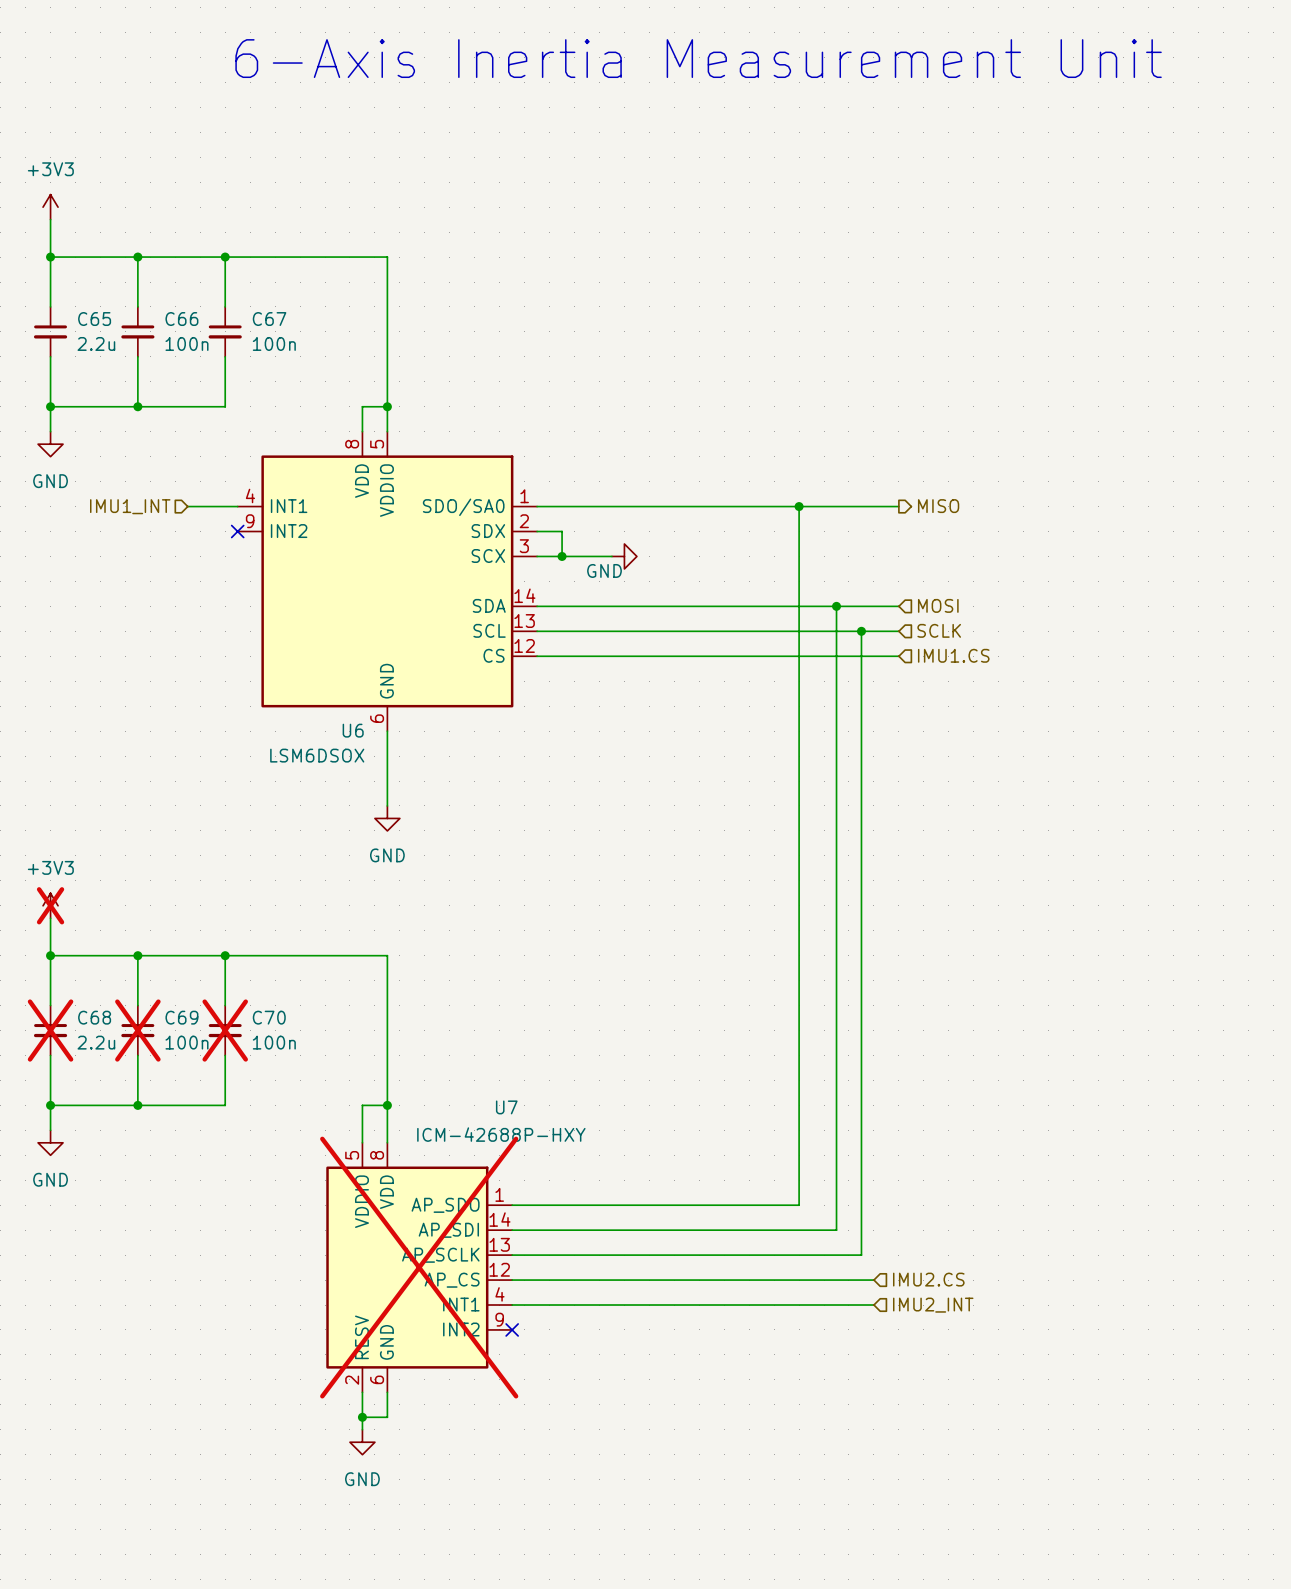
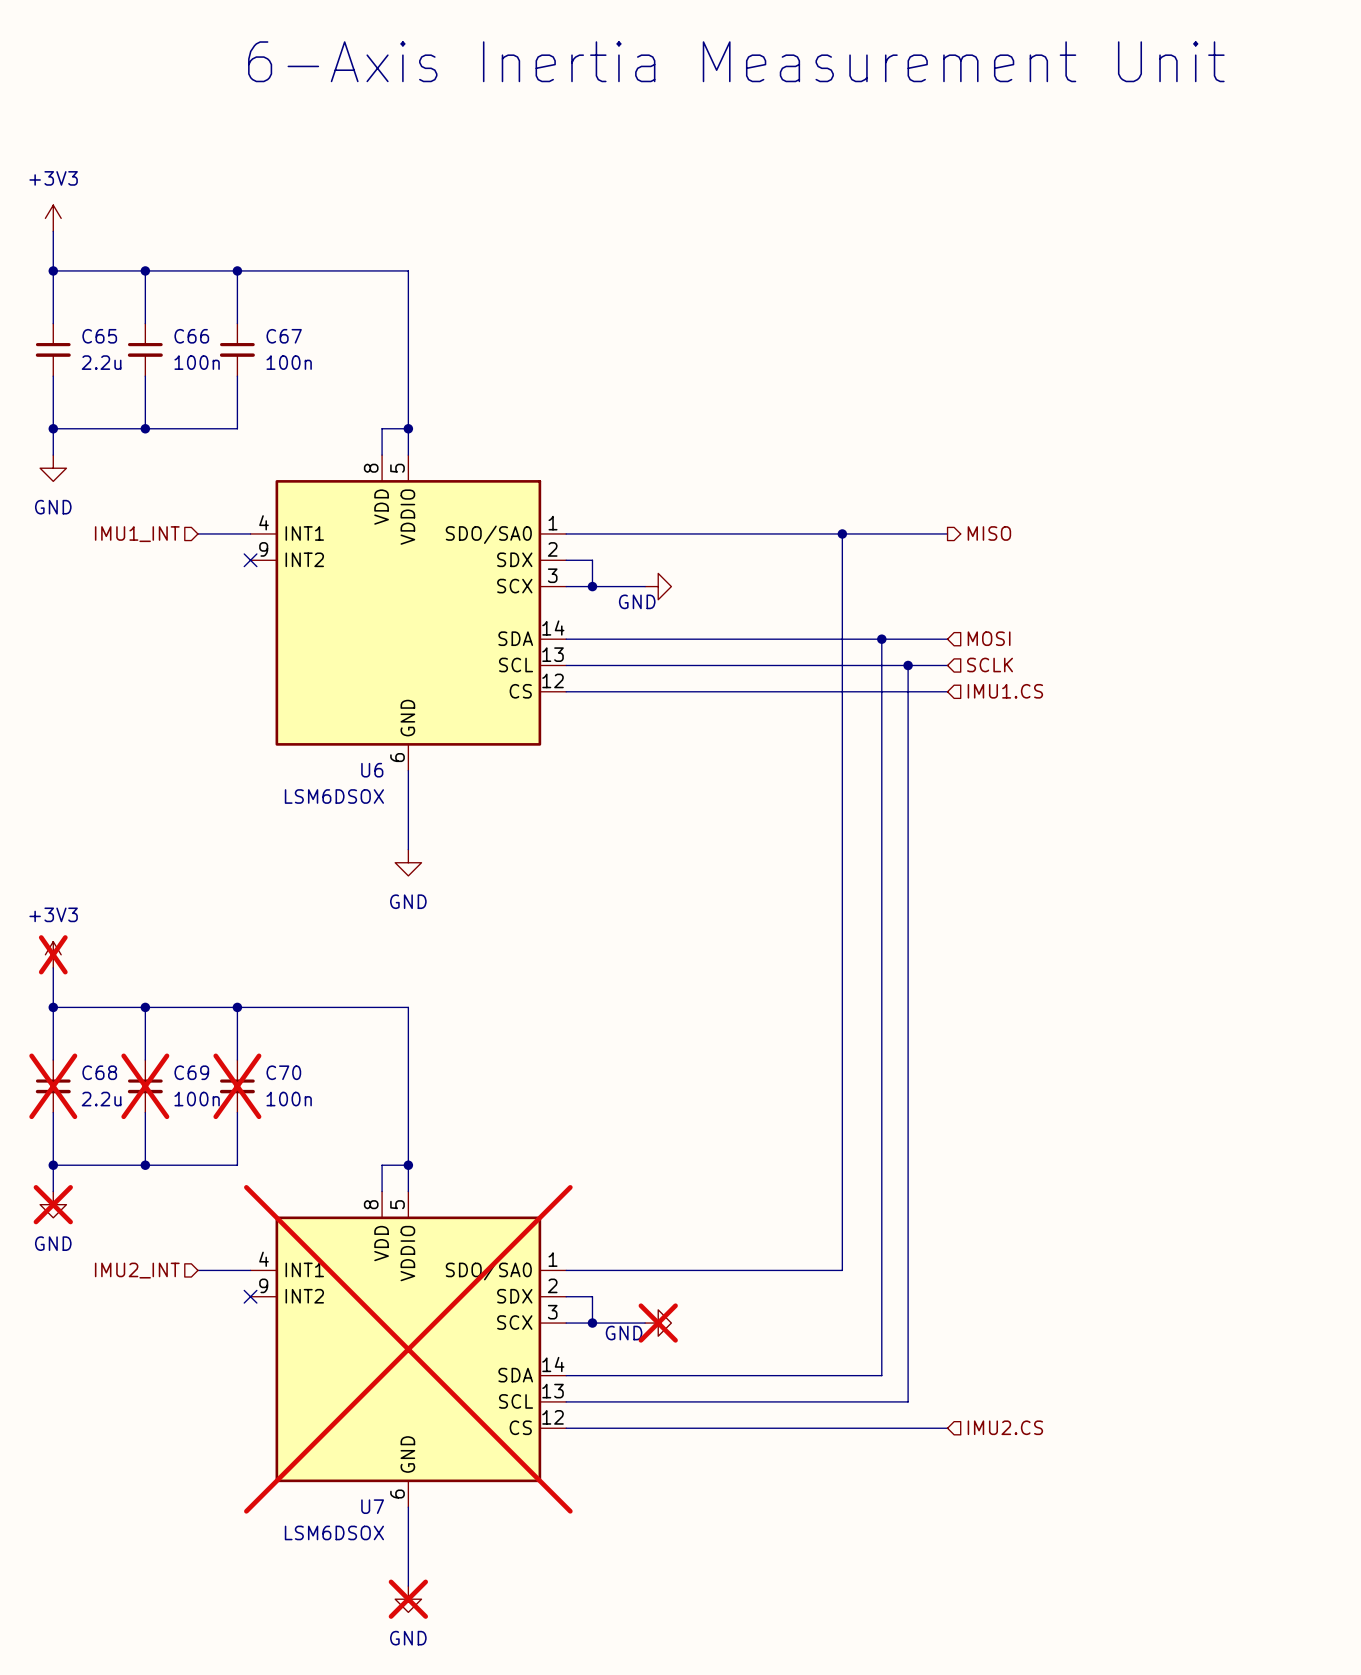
U7 name position: U7 (506, 1107) -> U7 (372, 1506)
U7 value: ICM-42688P-HXY (501, 1134) -> LSM6DSOX (334, 1532)
power symbol do-not-place cross: none -> (53, 1204)
U7 symbol: [326, 1142, 513, 1393] -> [250, 1191, 567, 1508]
hierarchical label: none -> IMU2_INT (137, 1270)
wire: none -> (197, 1270) (250, 1270)
no-connect mark: none -> (250, 1296)
wire: (562, 1230) (836, 1230) -> (592, 1296) (592, 1323)
junction: none -> (592, 1323)
wire: (611, 1255) (861, 1255) -> (566, 1401) (908, 1401) (908, 1323)
power symbol: none -> GND (658, 1323)
hierarchical label position: IMU2.CS (928, 1279) -> IMU2.CS (1005, 1427)
wire: (512, 1280) (873, 1280) -> (566, 1428) (947, 1428)
wire: (836, 1305) (873, 1305) -> (881, 1375) (881, 1296)
hierarchical label: IMU2_INT (933, 1305) -> none
no-connect mark: (512, 1329) -> none
junction: (362, 1417) -> none
wire: none -> (408, 1507) (408, 1586)
power symbol position: GND (362, 1442) -> GND (408, 1599)
power symbol do-not-place cross: none -> (408, 1599)

